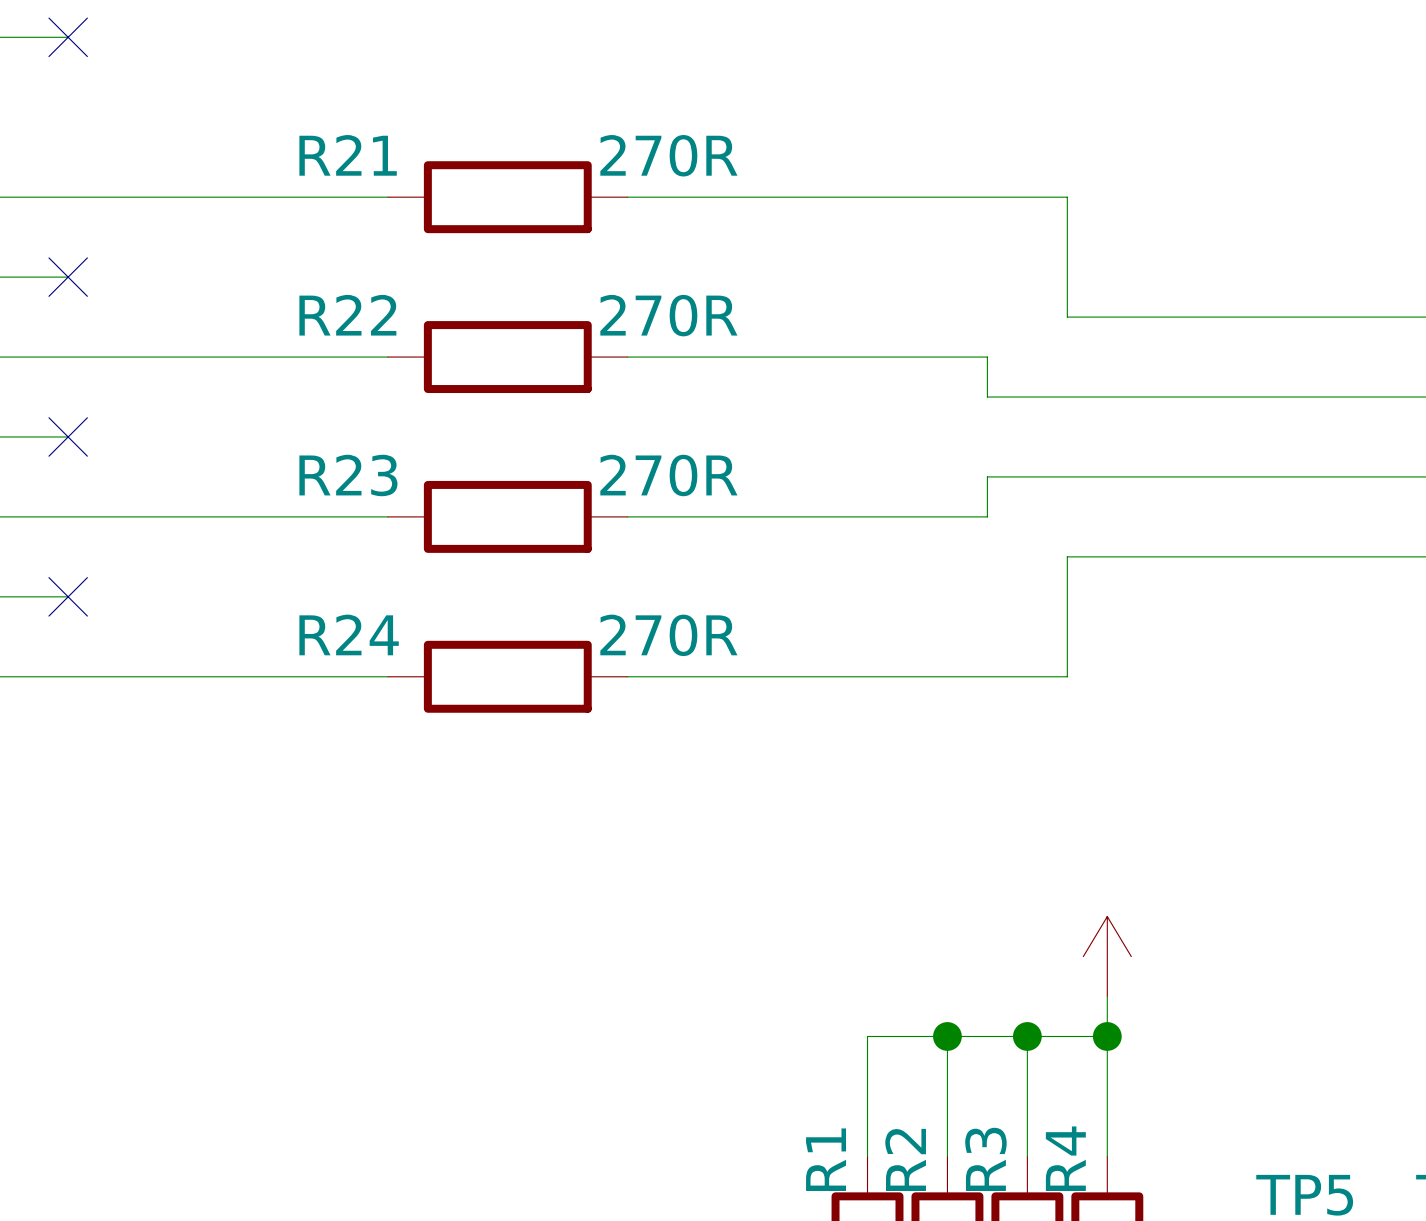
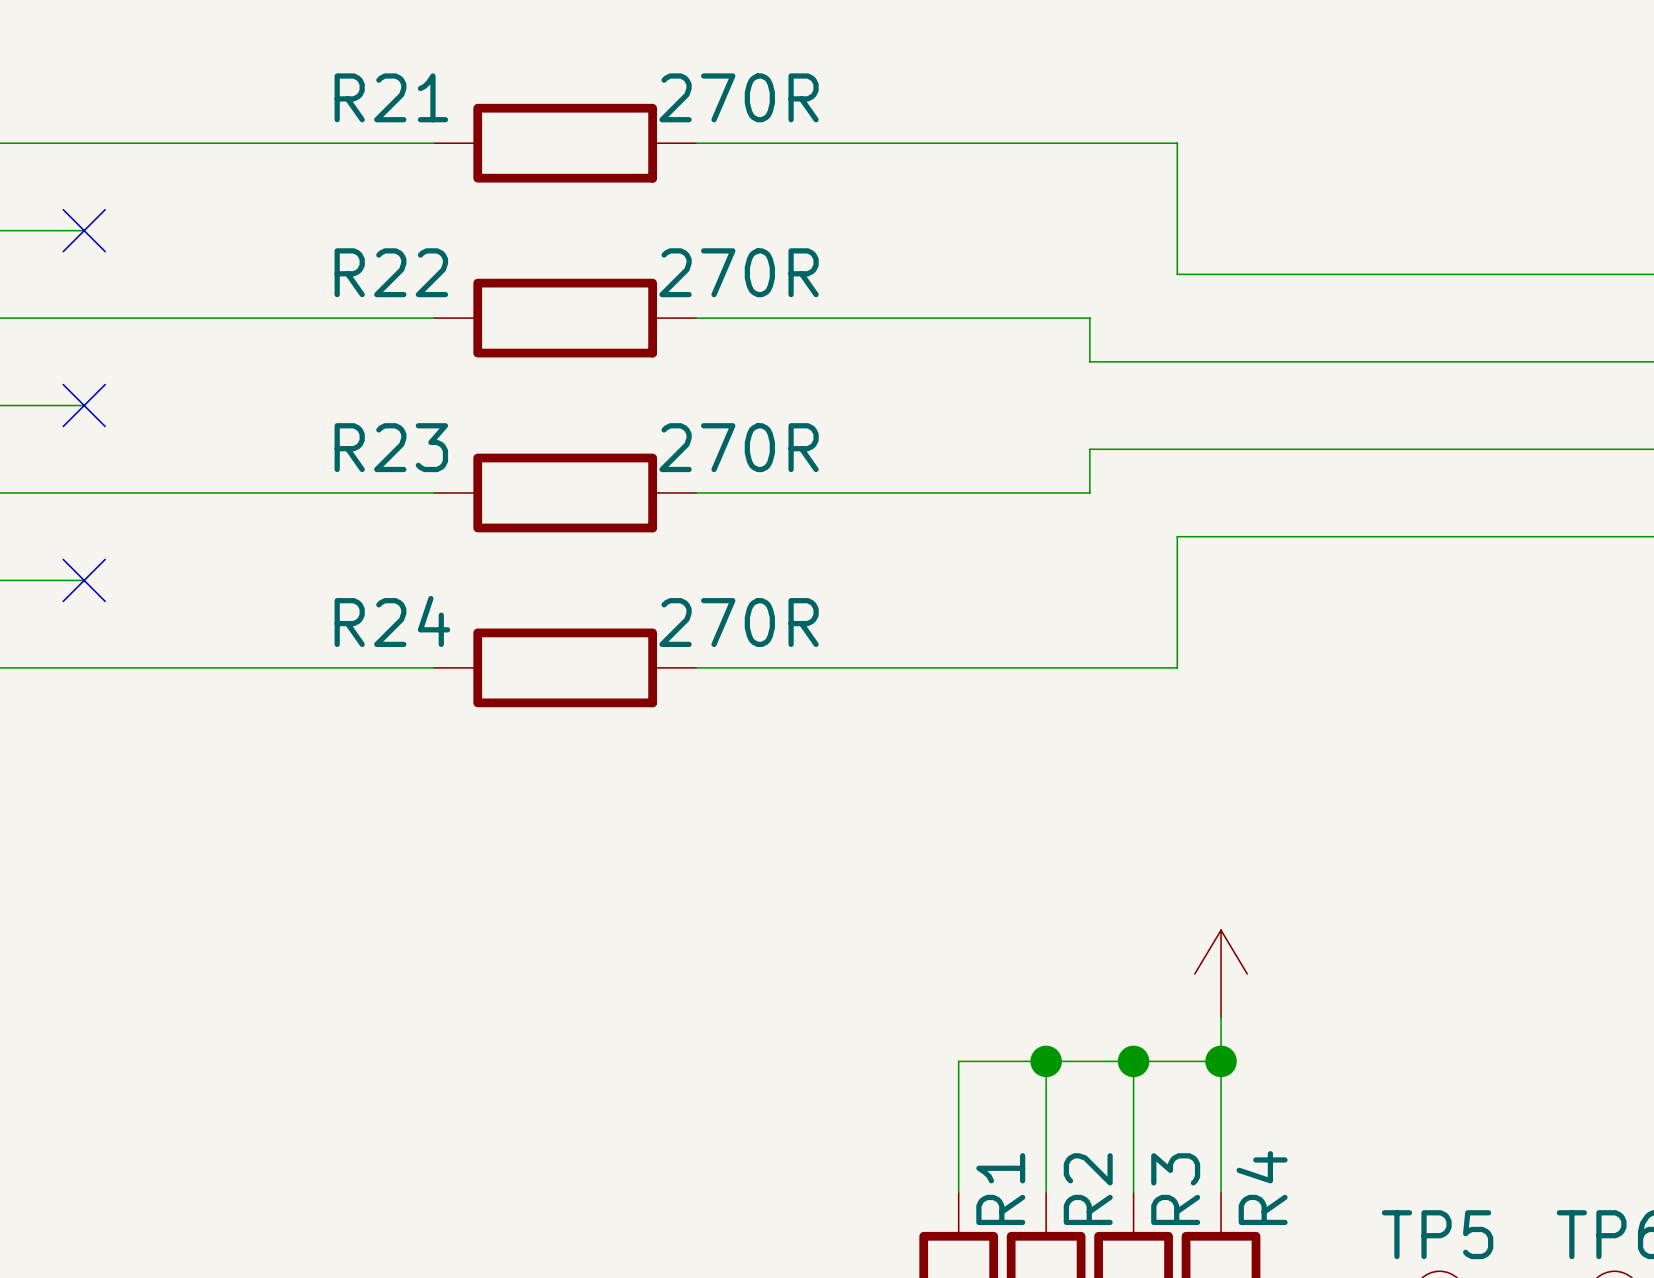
R4 name position: R4 (1065, 1158) -> R4 (1262, 1188)
R1 name position: R1 (826, 1159) -> R1 (1000, 1189)
R2 name position: R2 (905, 1159) -> R2 (1088, 1189)
R3 name position: R3 (985, 1159) -> R3 (1175, 1189)

